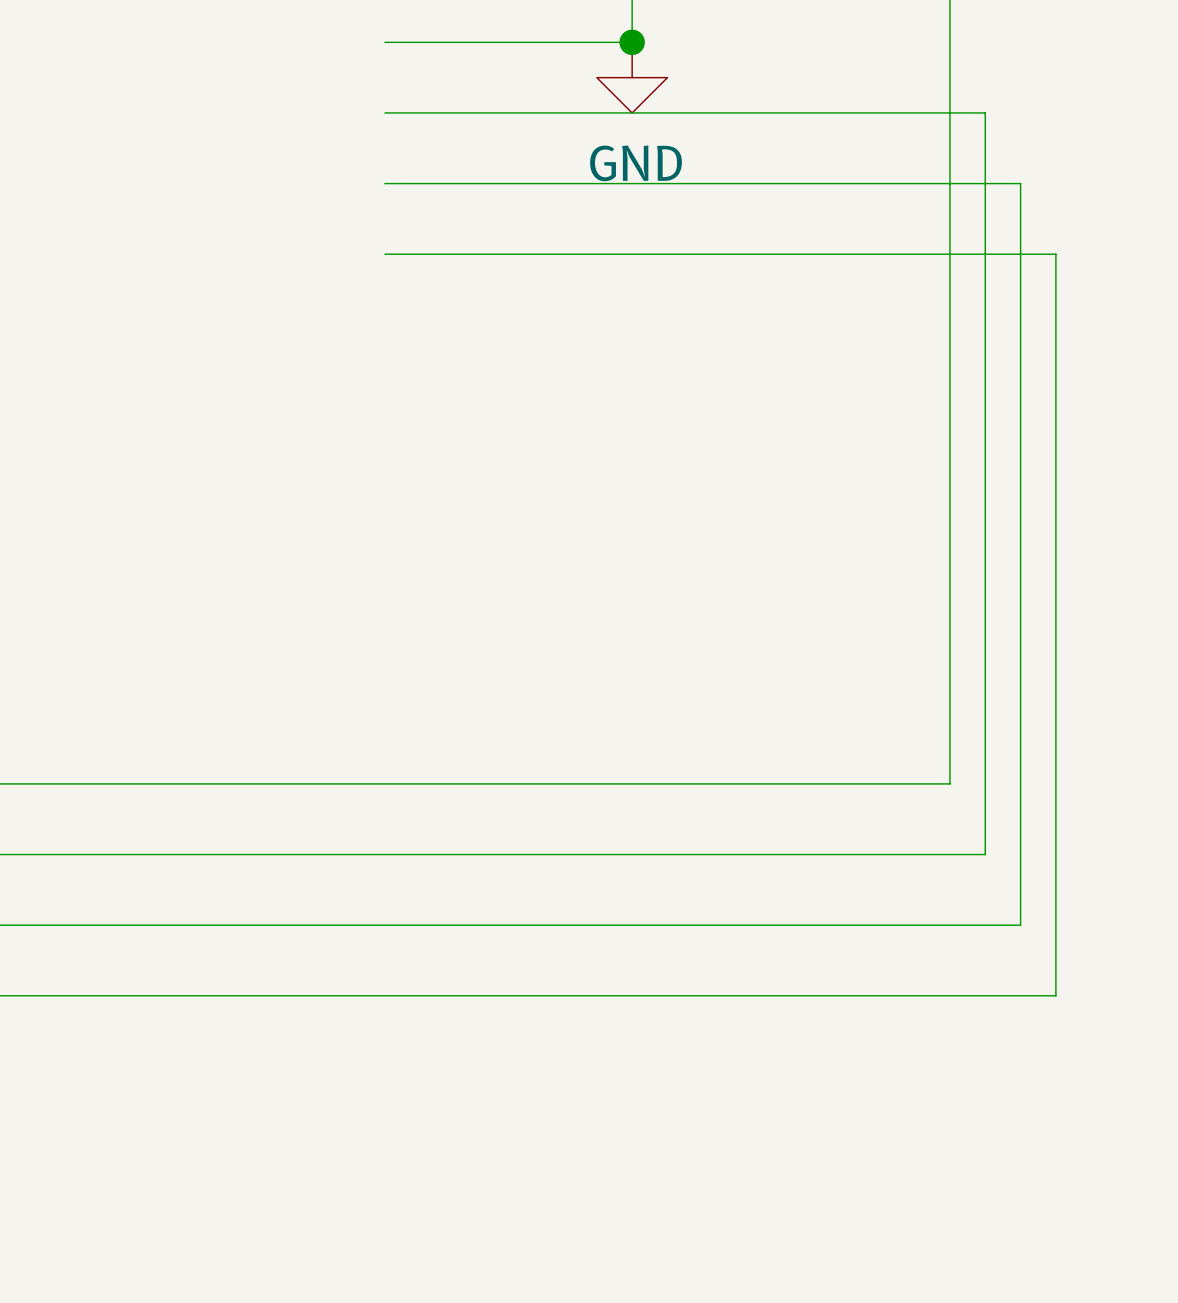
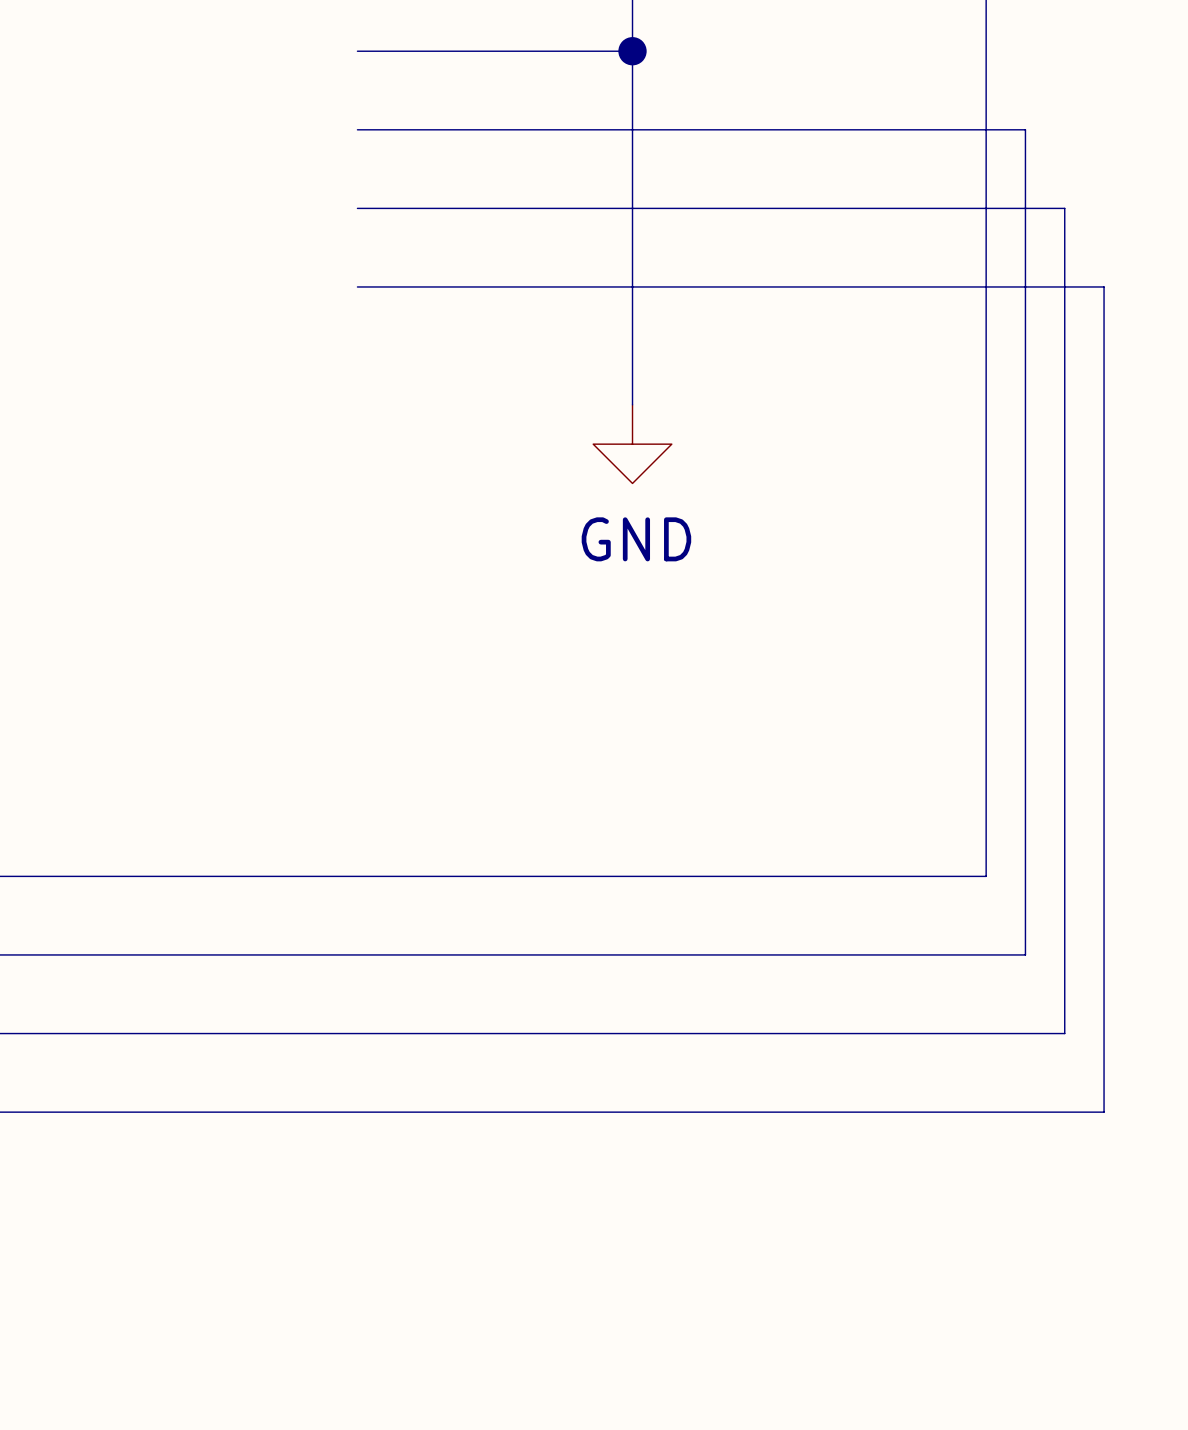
wire: none -> (632, 51) (632, 404)
power symbol position: GND (632, 77) -> GND (632, 444)

